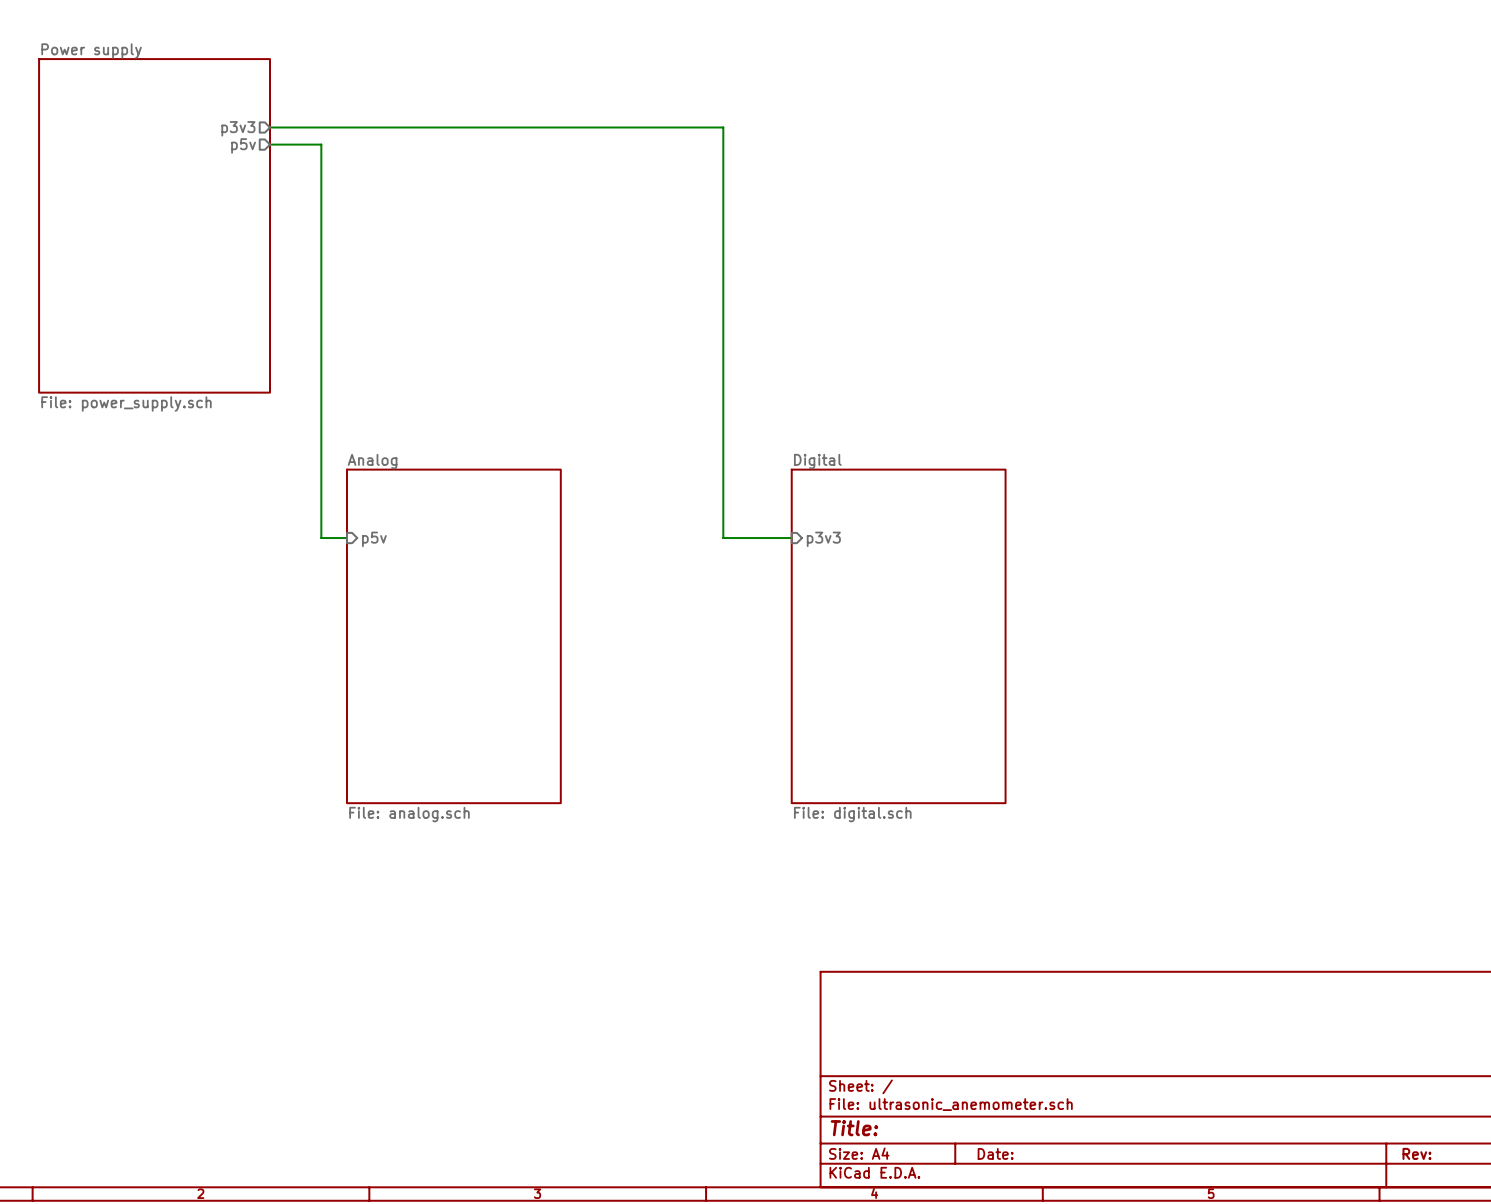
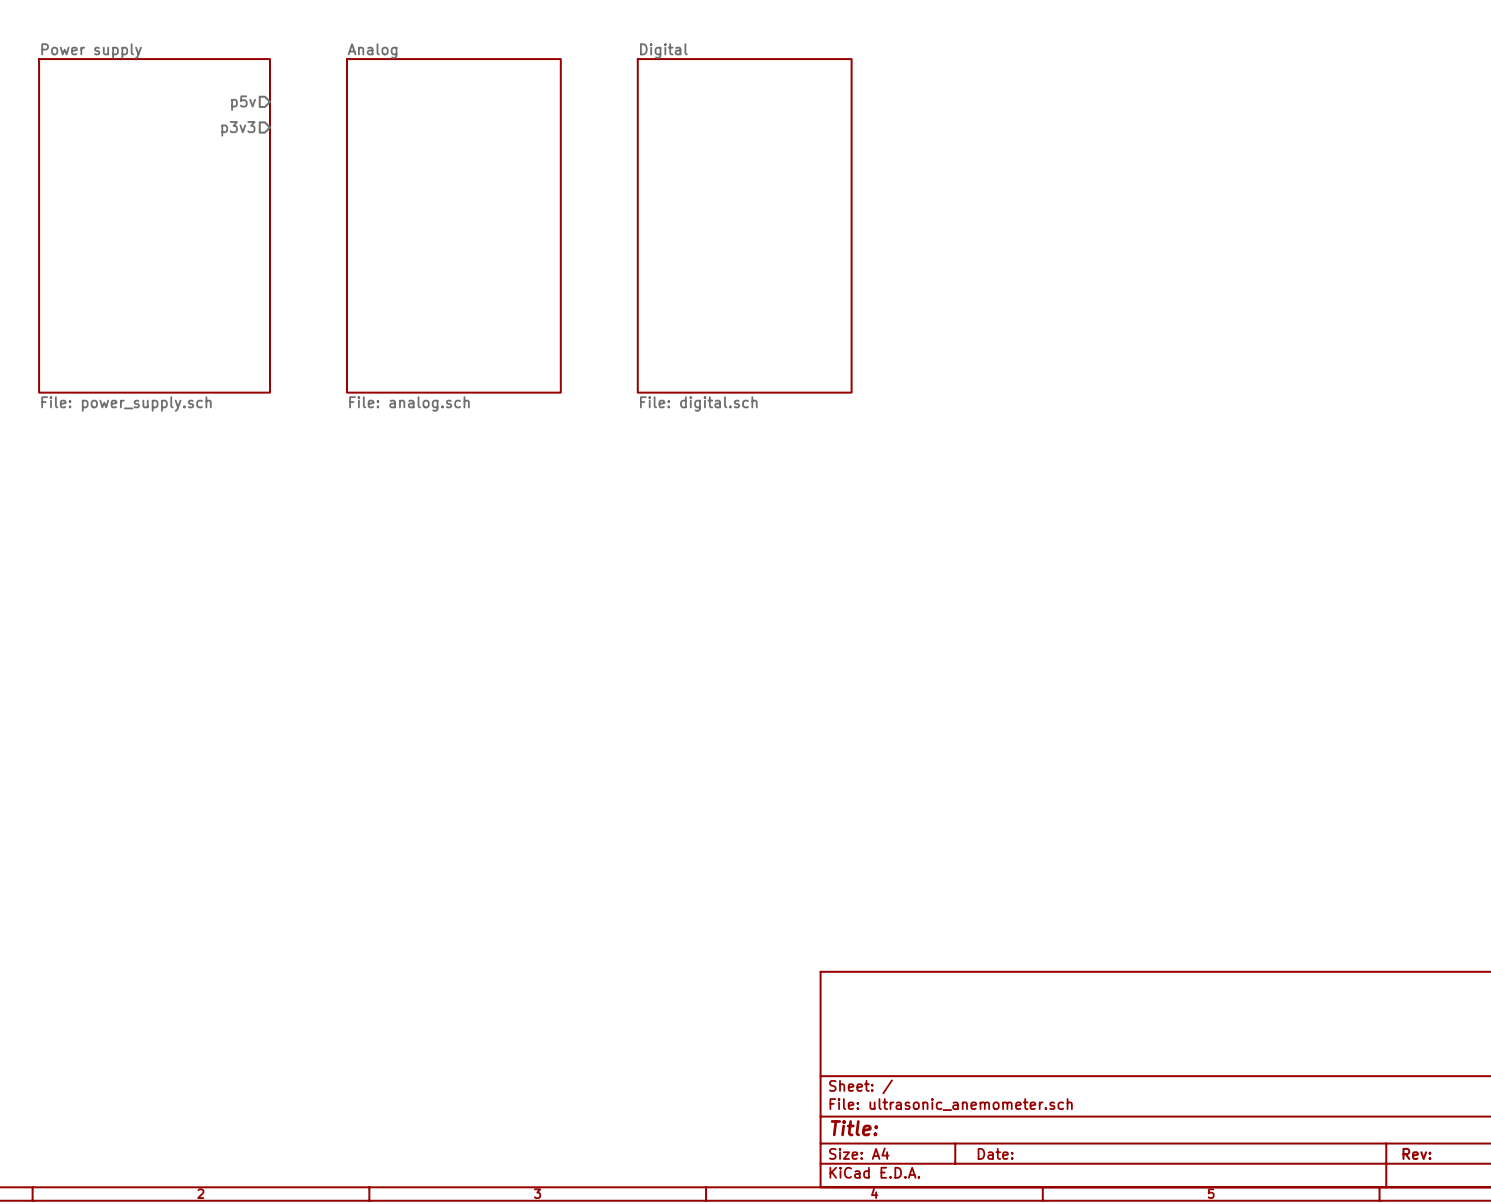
wire: (270, 127) (723, 127) (723, 538) (791, 538) -> none
wire: (270, 144) (321, 144) (321, 538) (346, 538) -> none
sheet pin position: p5v (243, 145) -> p5v (243, 103)
sheet Analog: none -> File: analog.sch (453, 225)
sheet Digital: none -> File: digital.sch (744, 225)
sheet pin: p5v (374, 539) -> none
sheet pin: p3v3 (823, 539) -> none
sheet Analog: File: analog.sch (453, 636) -> none
sheet Digital: File: digital.sch (898, 636) -> none

